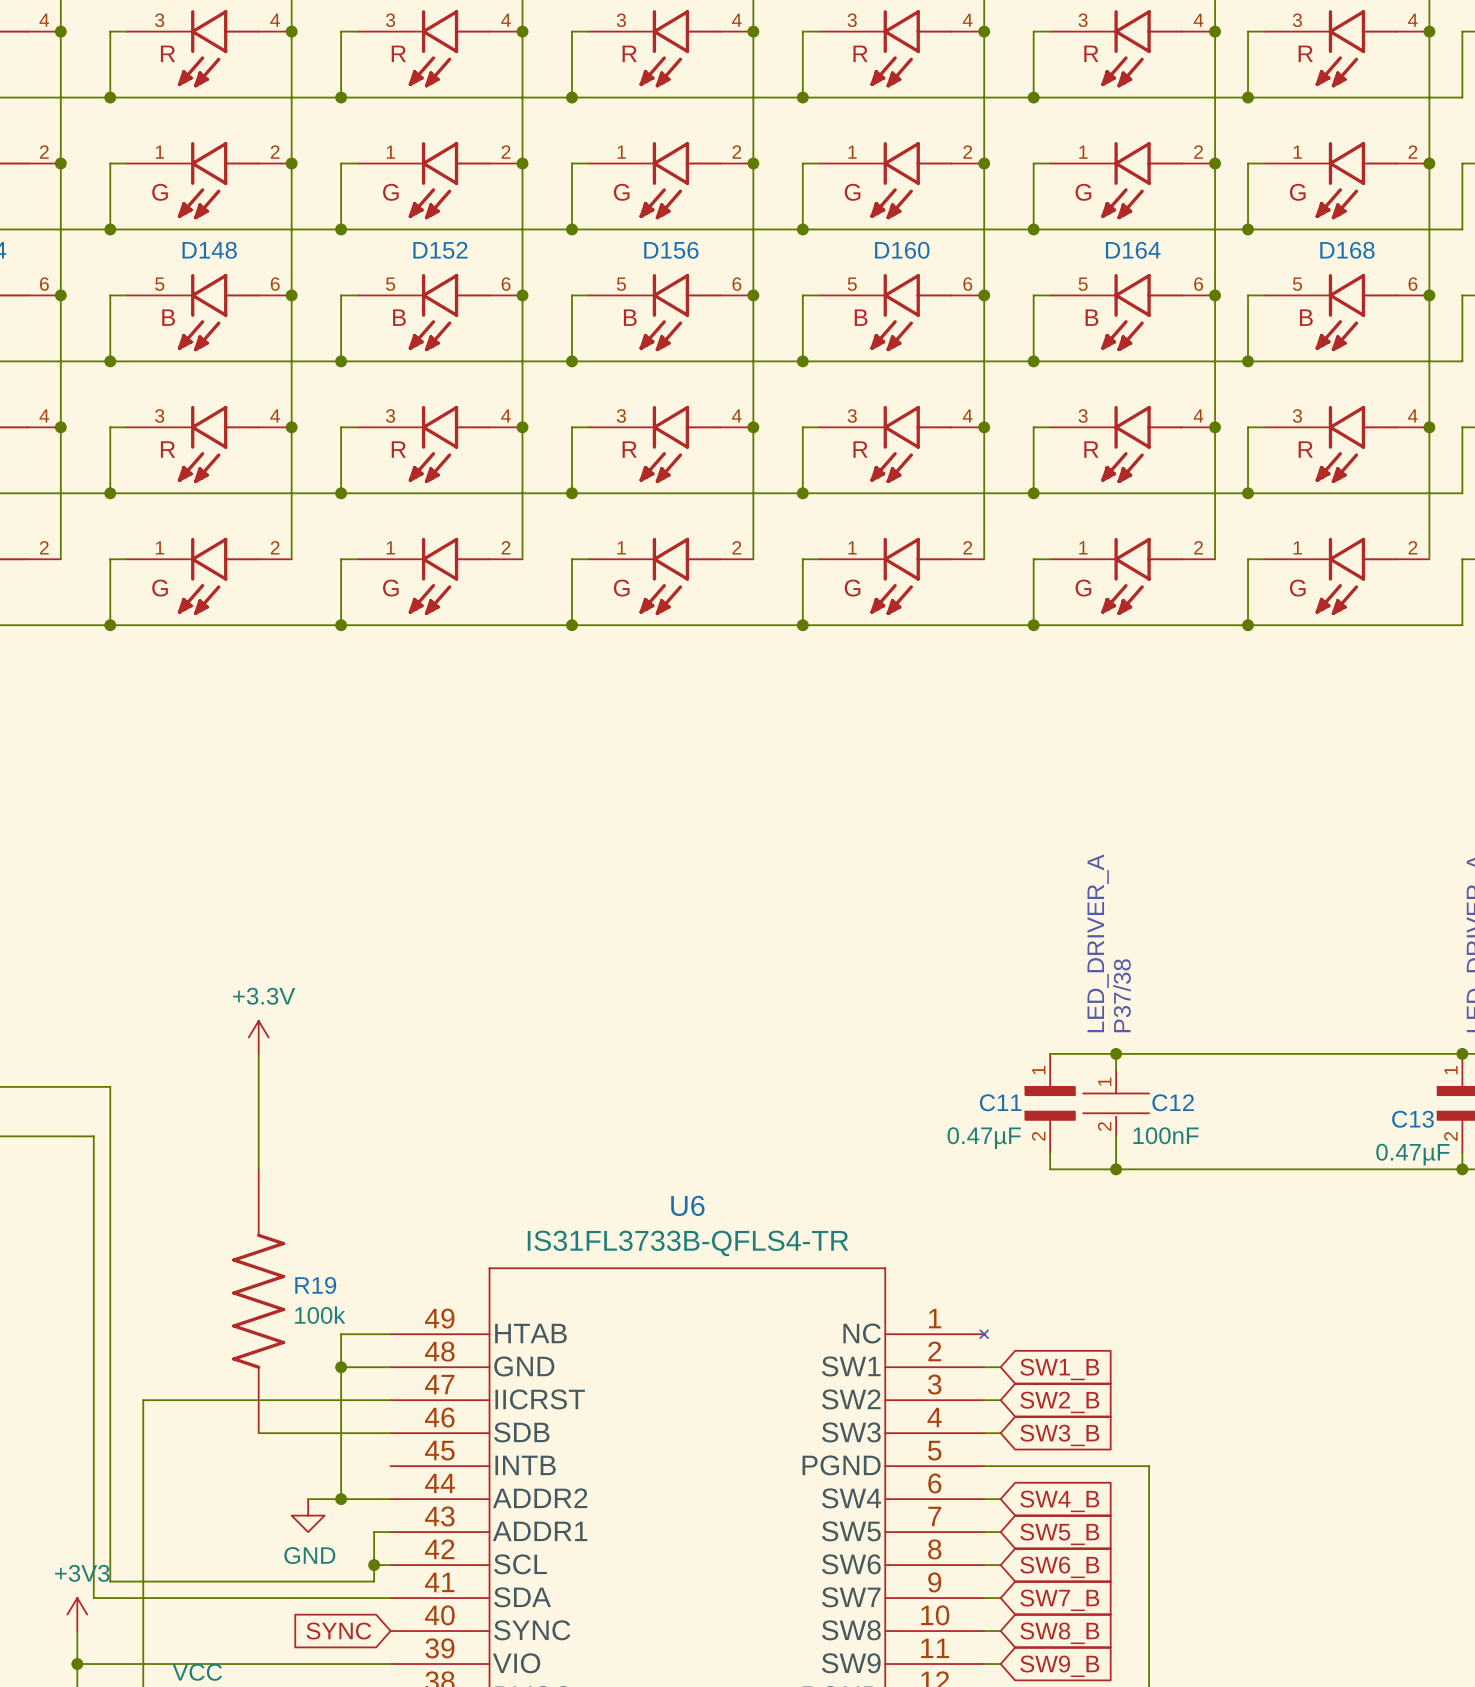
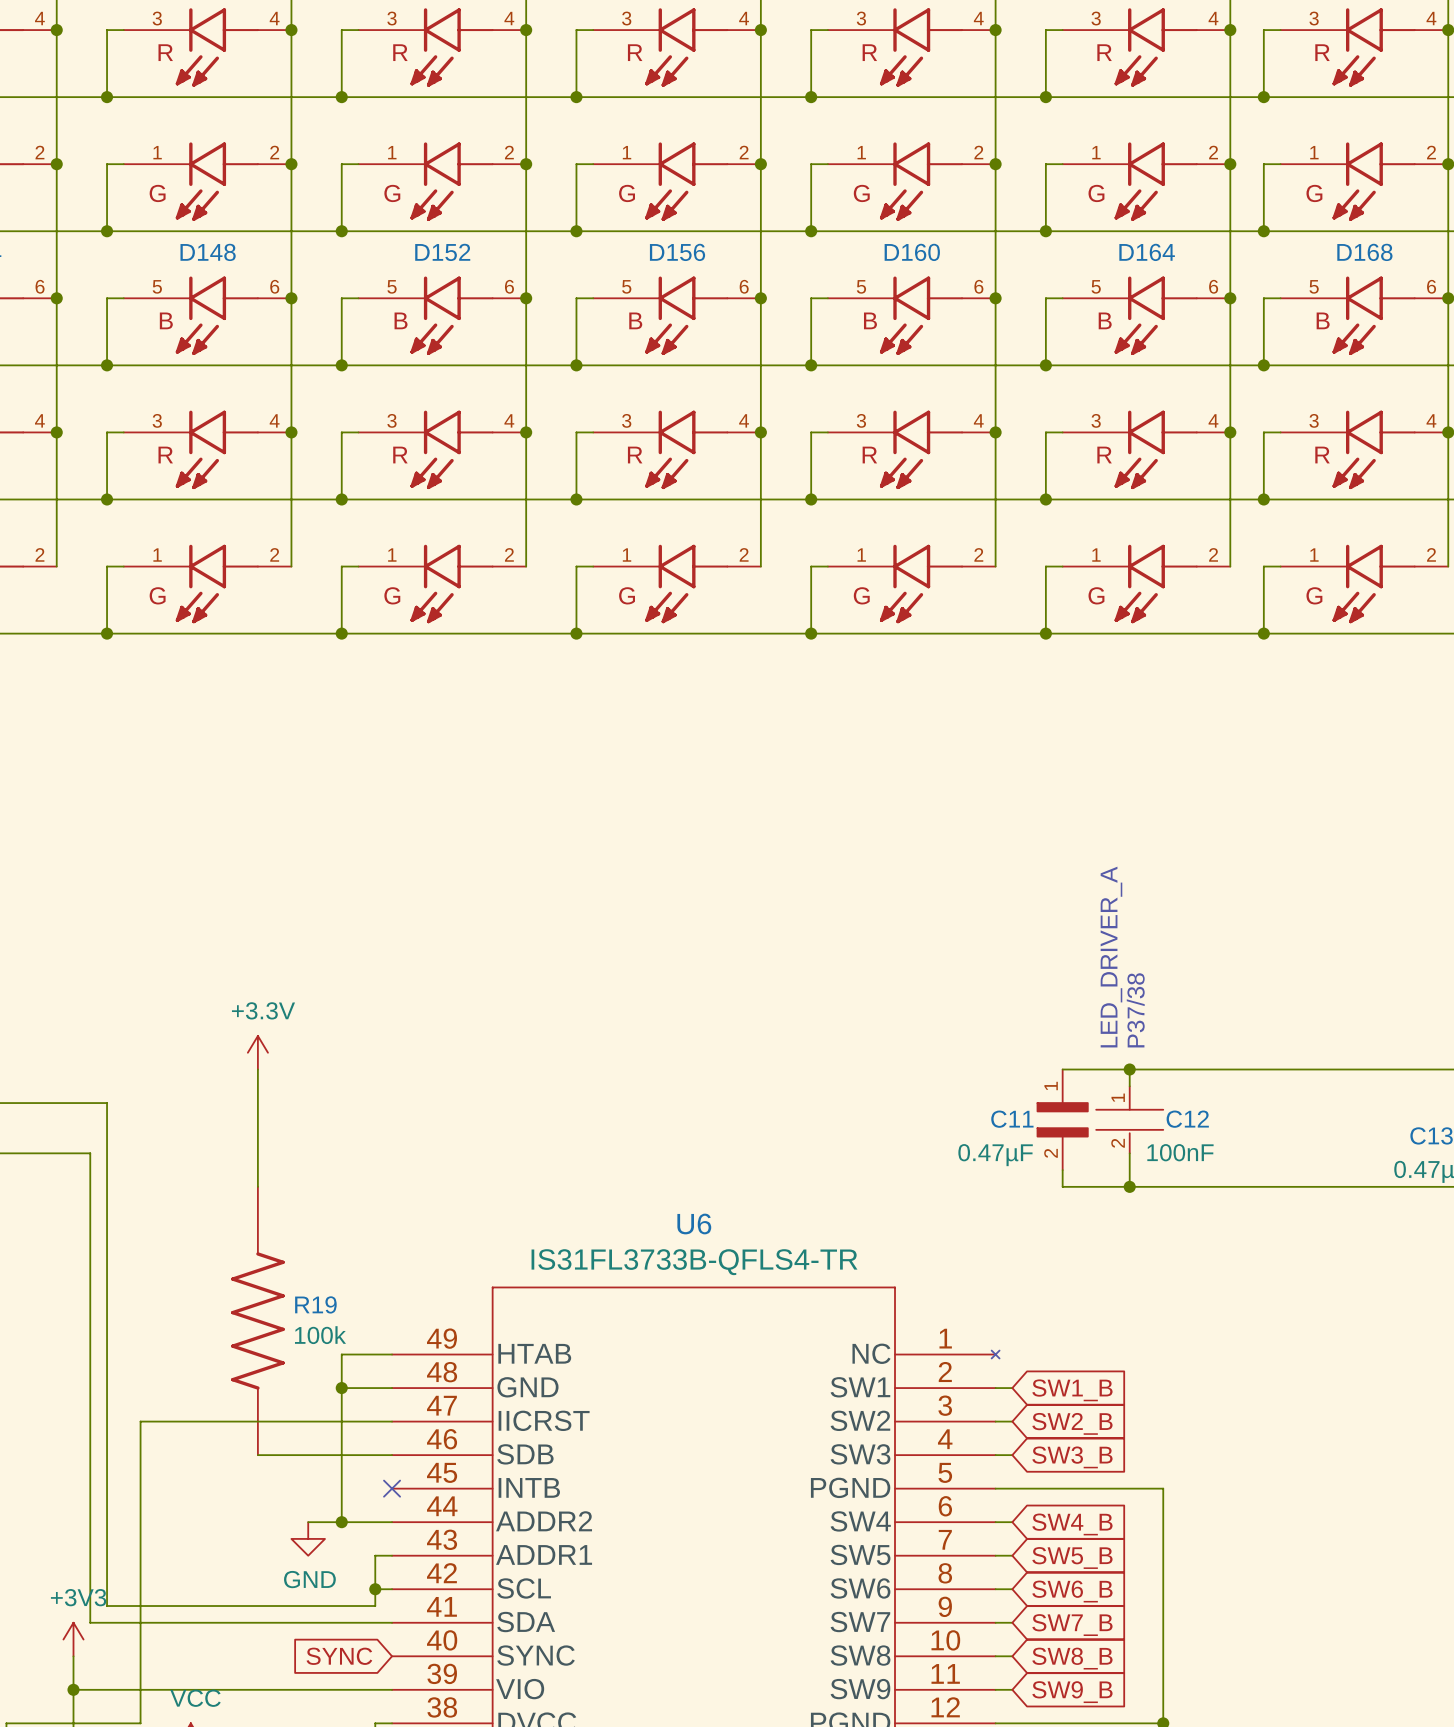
no-connect mark: none -> (392, 1488)

